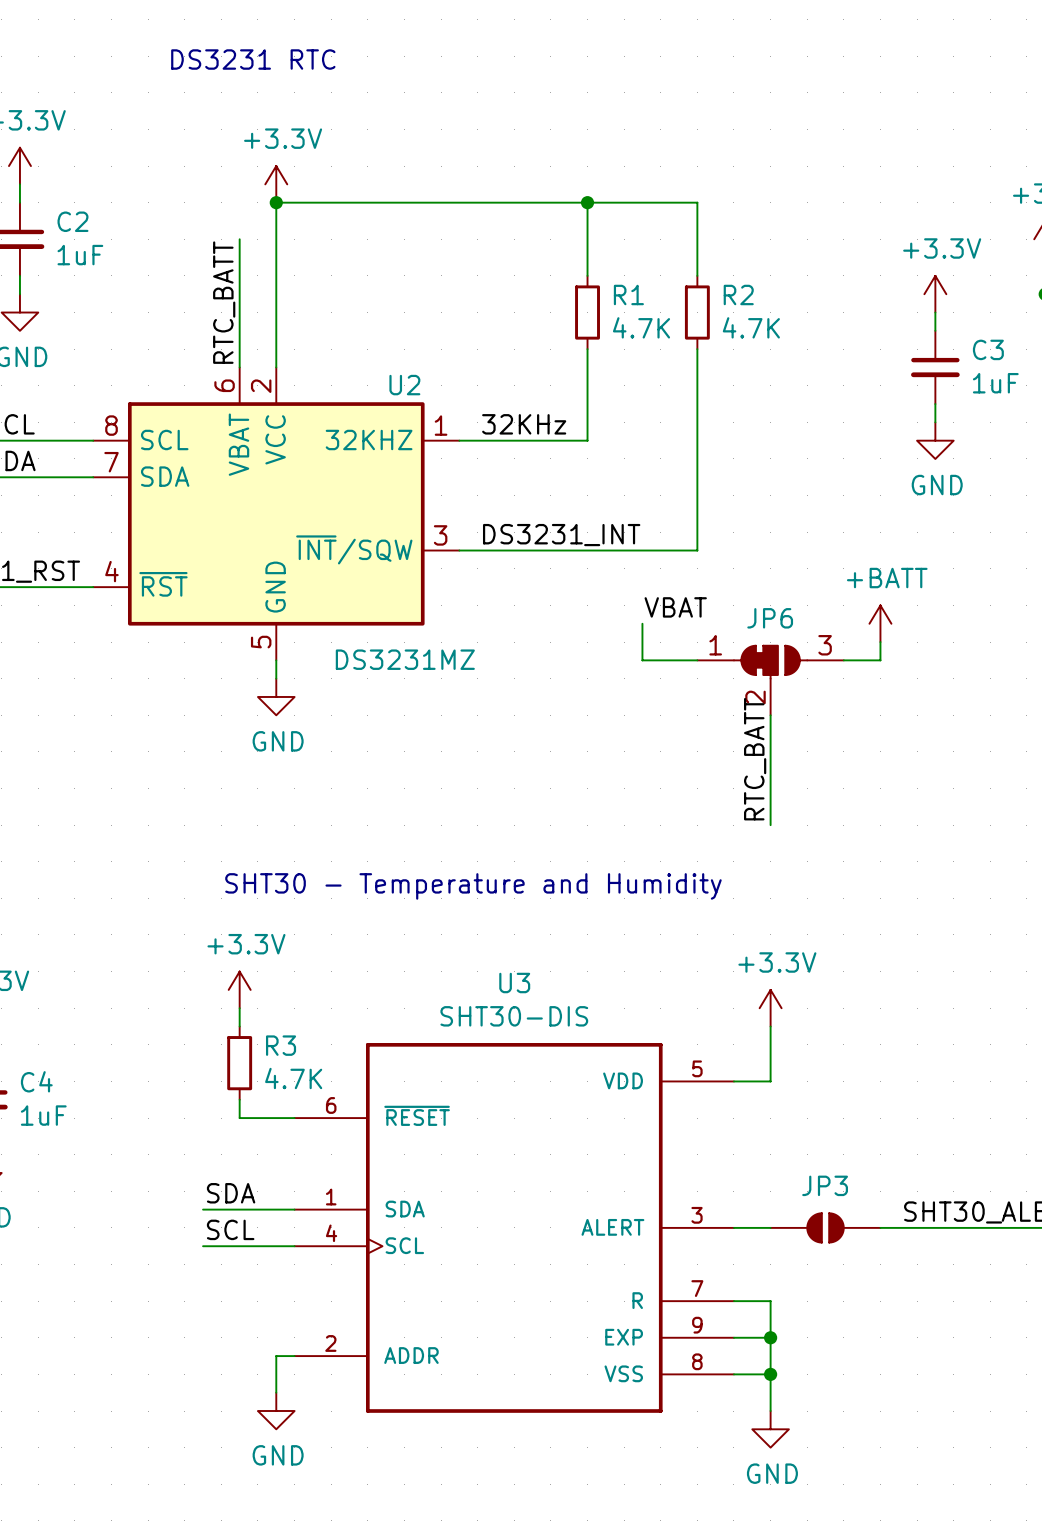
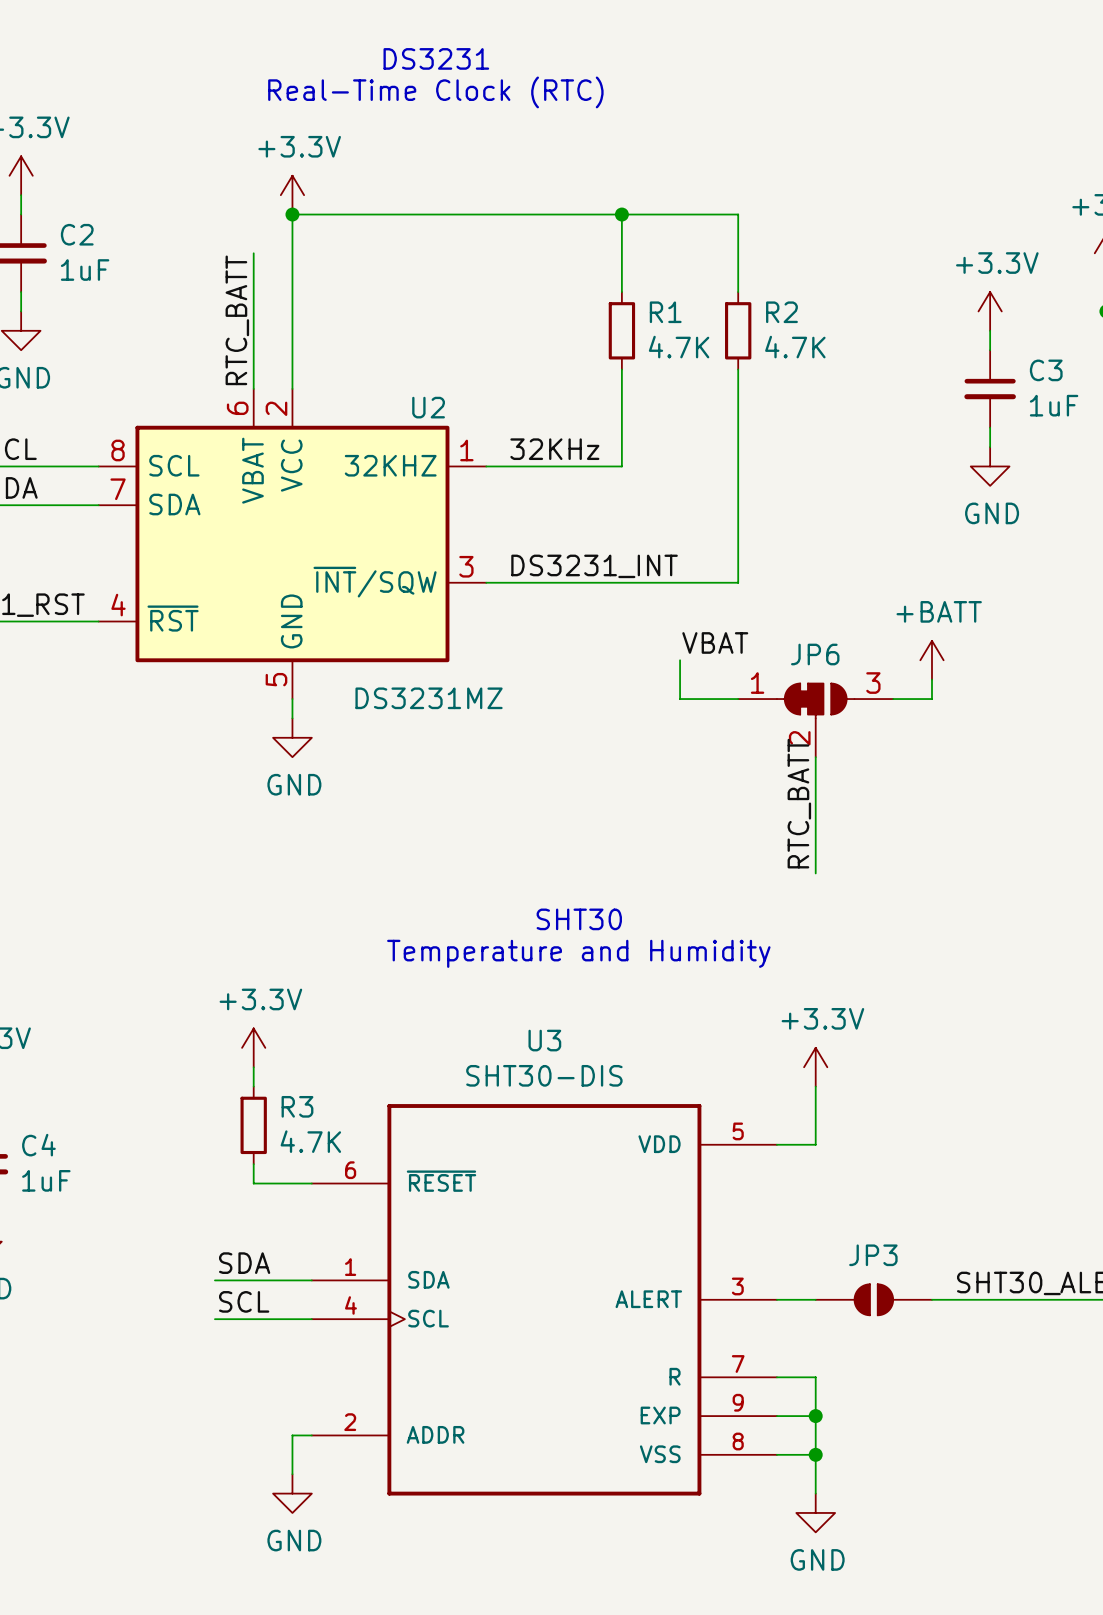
text: DS3231 RTC (253, 59) -> DS3231 (436, 58)
text: none -> Real-Time Clock (RTC) (435, 92)
text: none -> SHT30 (579, 919)
text: SHT30 - Temperature and Humidity (473, 886) -> Temperature and Humidity (578, 953)

